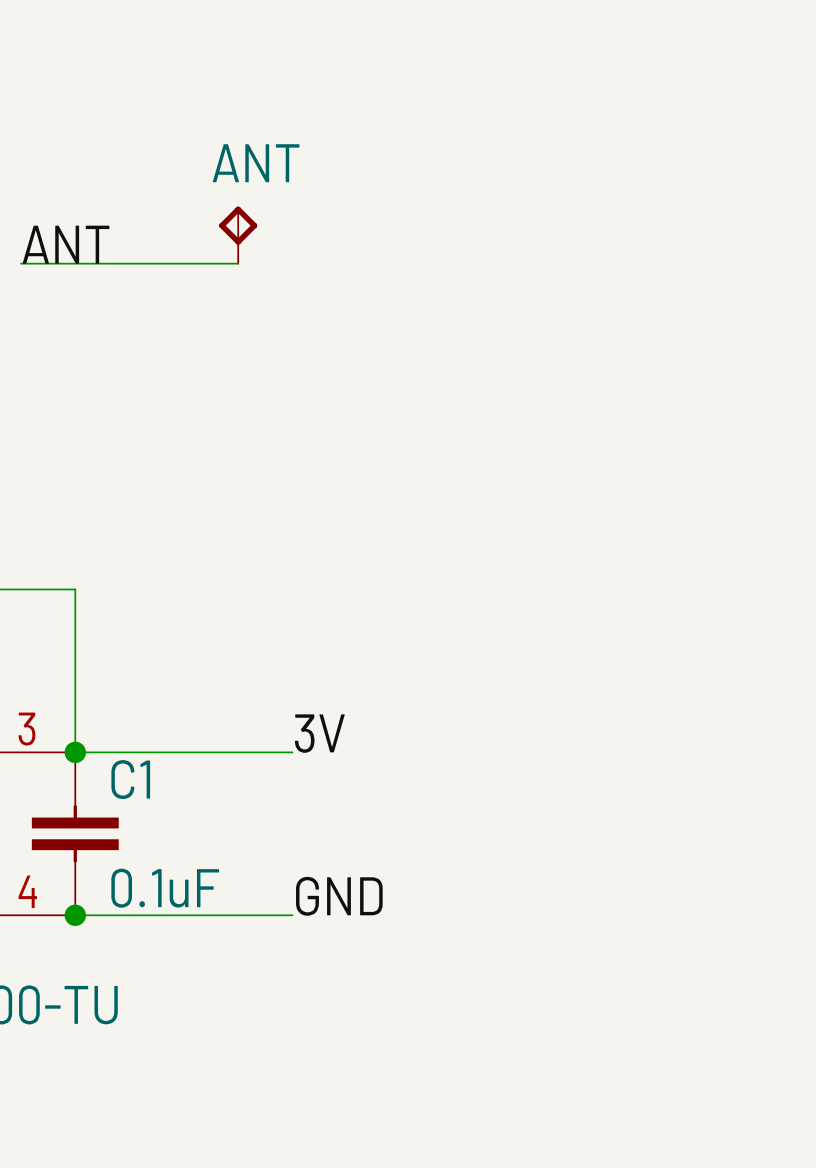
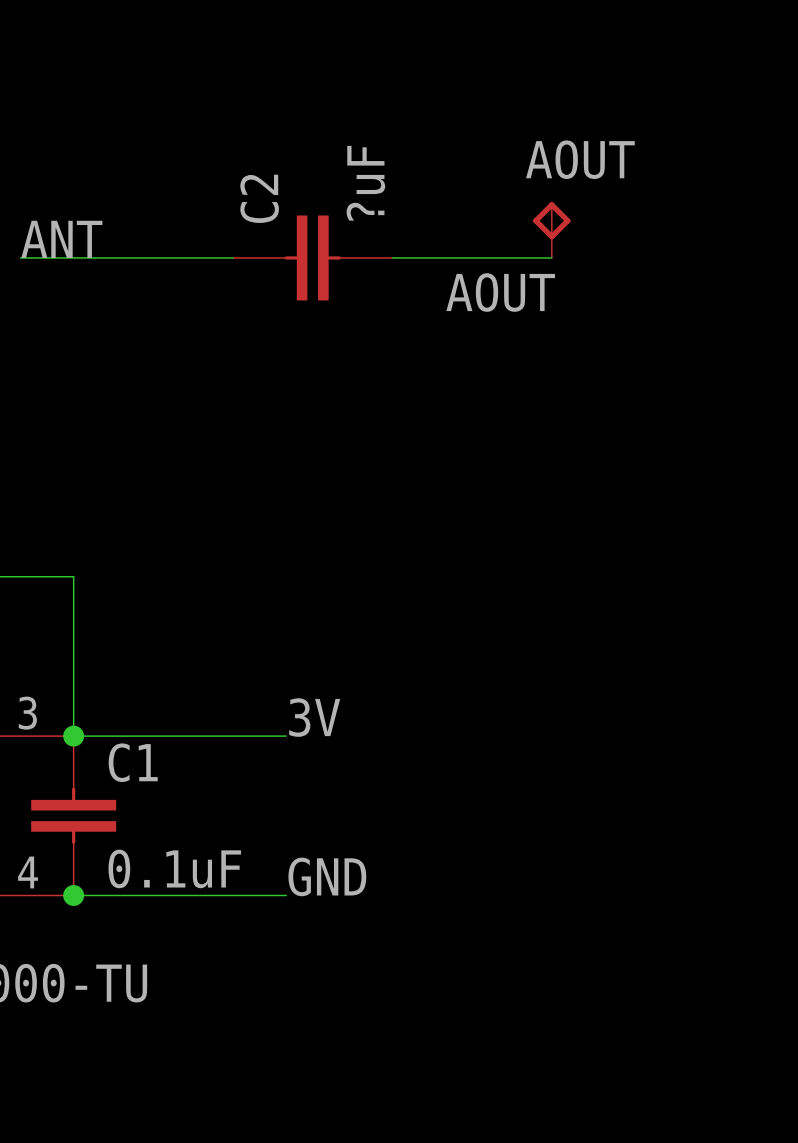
ANT: (238, 235) -> none
AOUT: none -> (551, 230)
C2: none -> ?uF (312, 257)
wire: none -> (392, 257) (551, 257)
label: none -> AOUT (500, 292)

